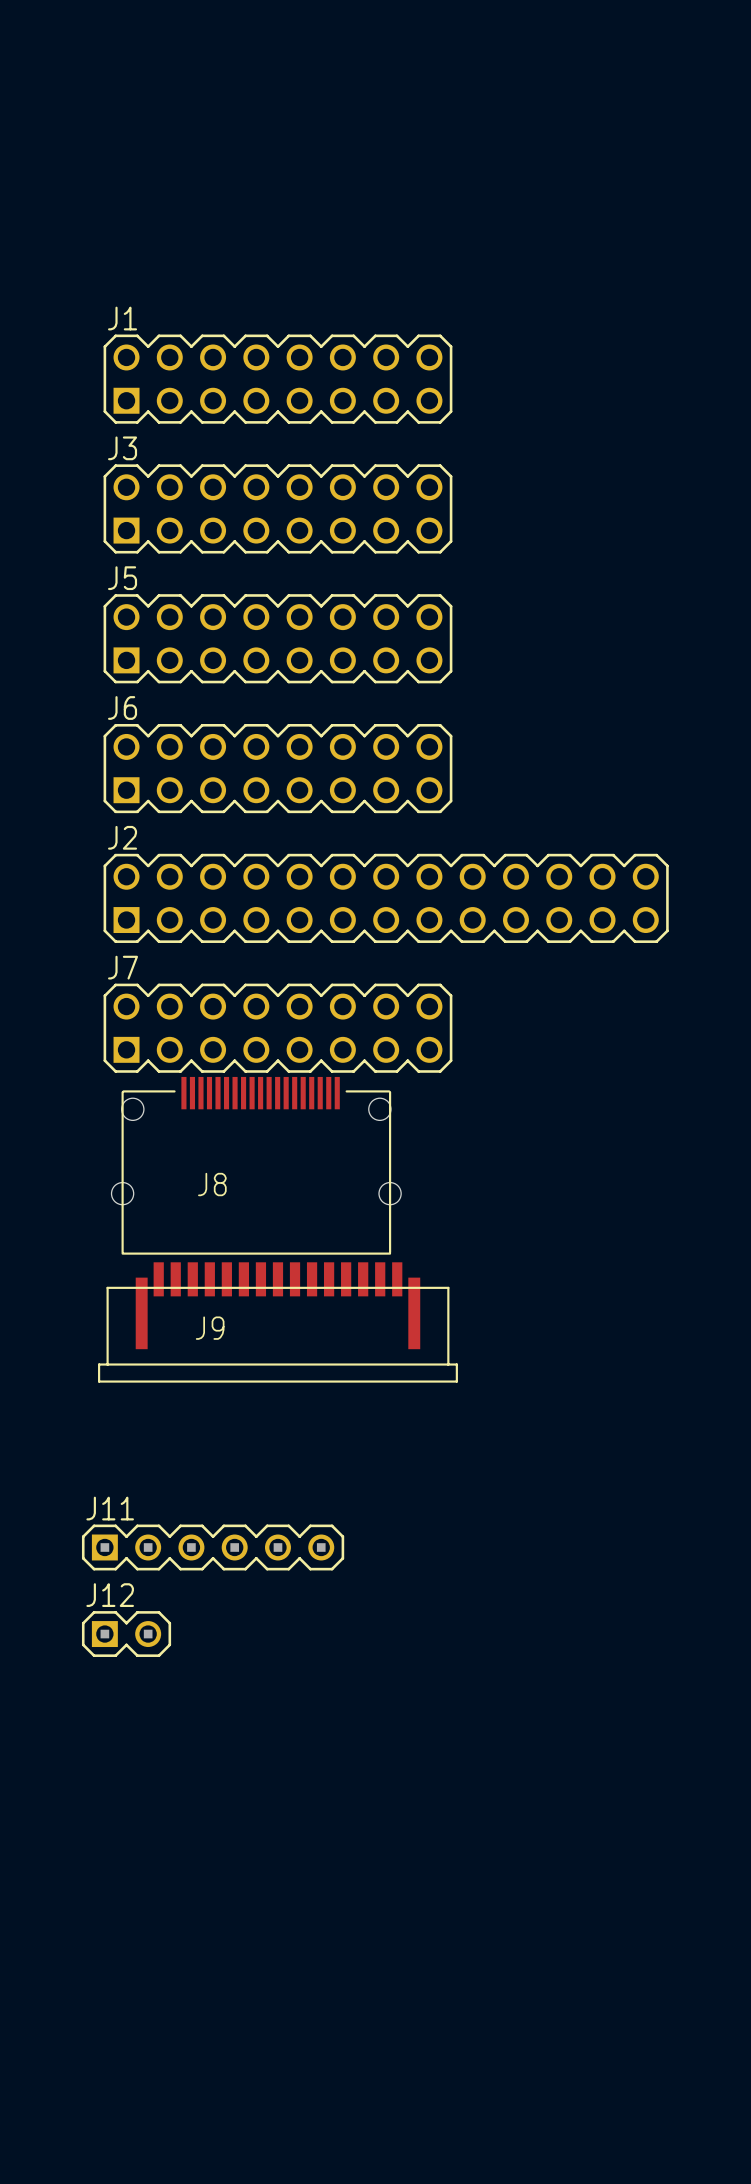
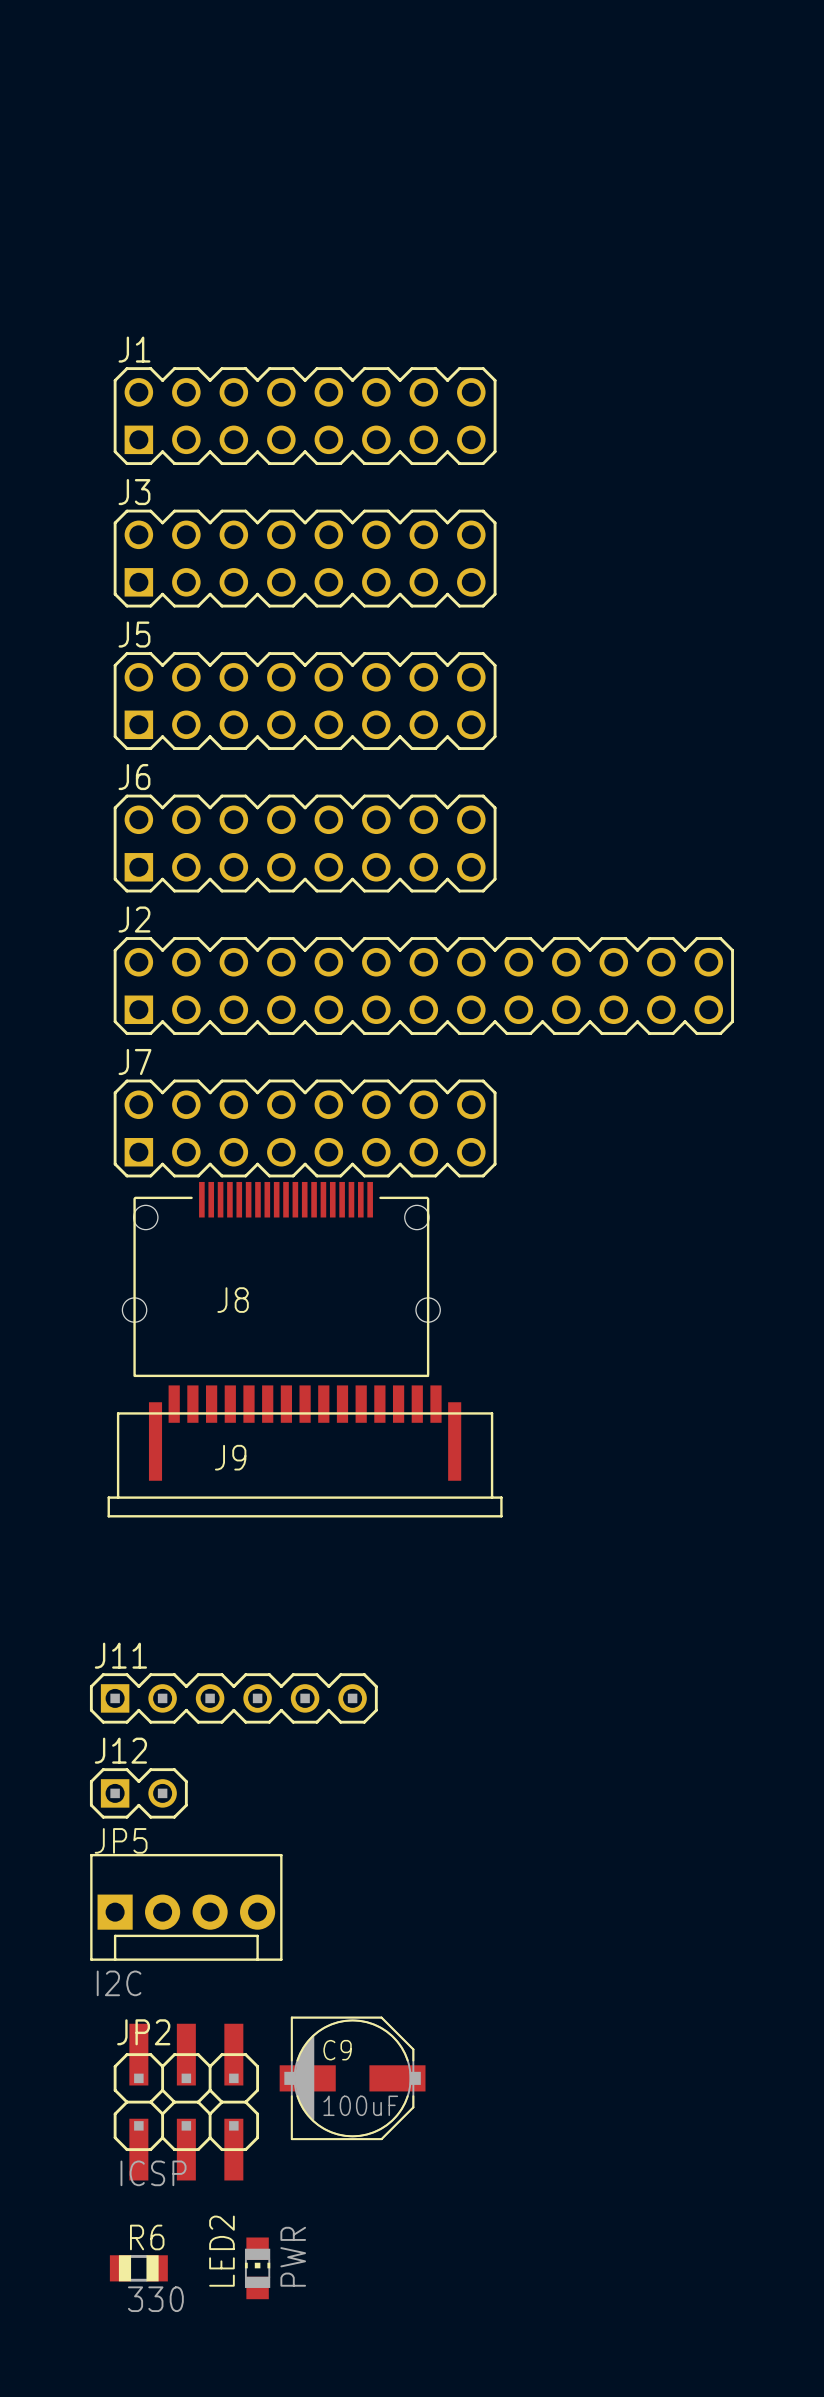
JP5: none -> I2C (186, 1907)
C9: none -> 100uF (352, 2078)
JP2: none -> ICSP (186, 2102)
R6: none -> 330 (138, 2268)
LED2: none -> PWR (257, 2268)

